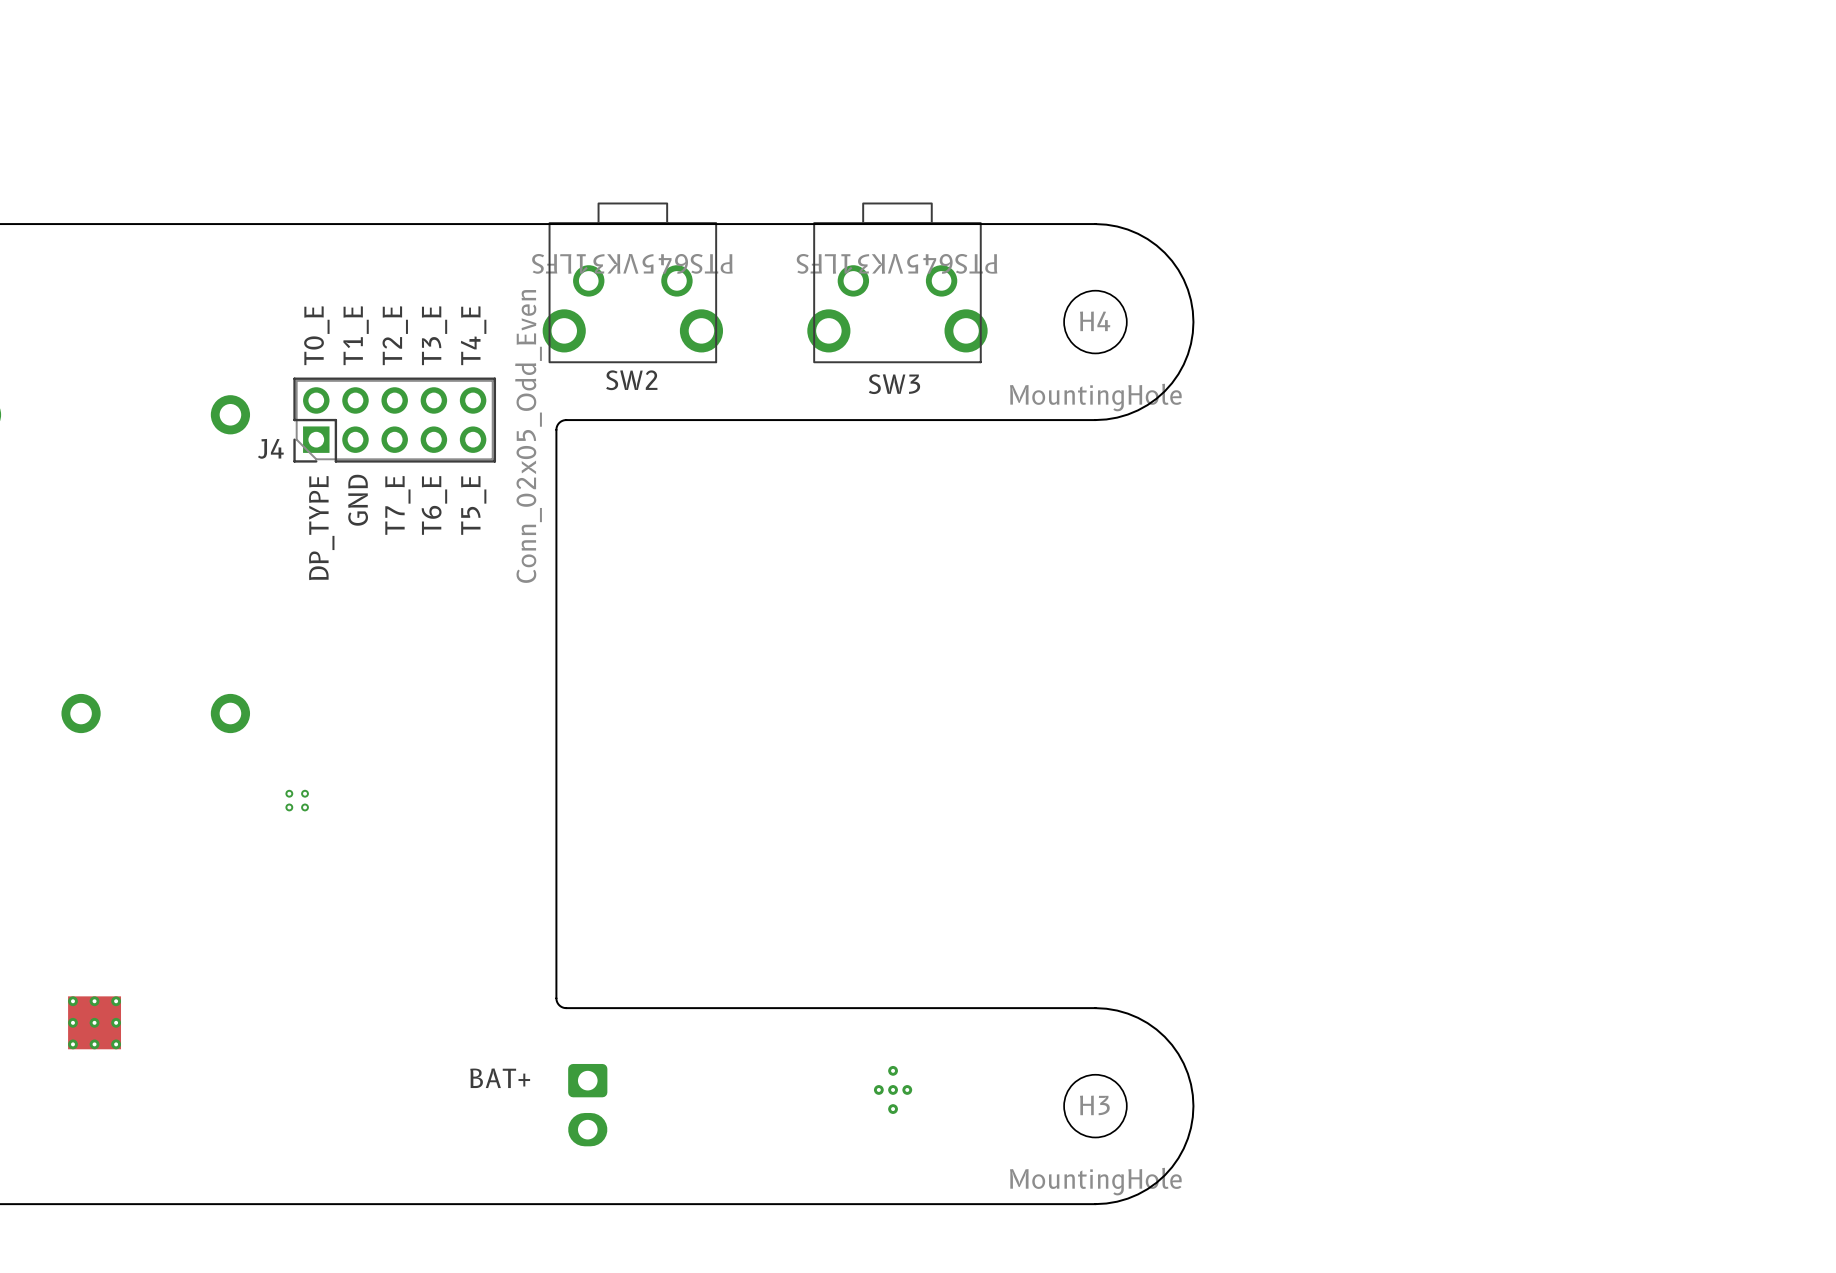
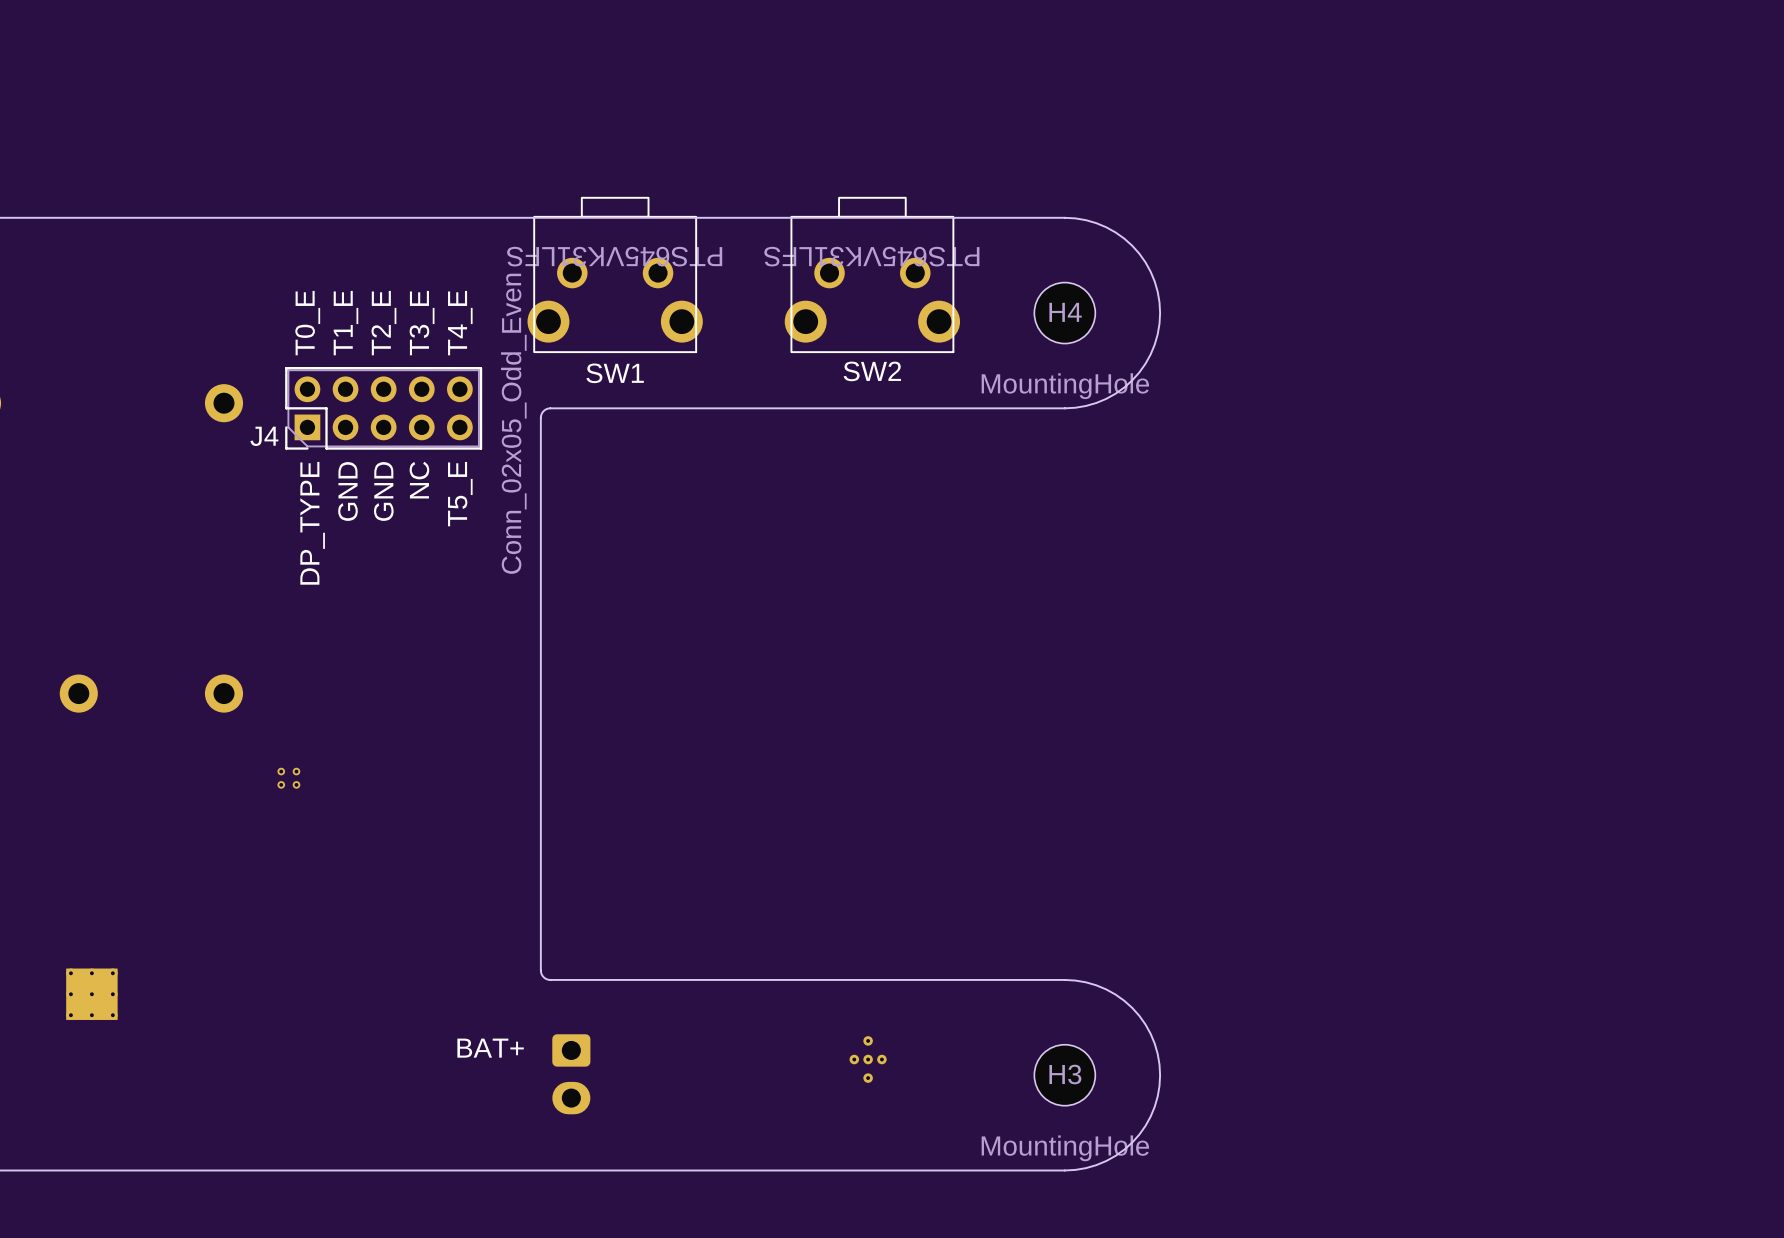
SW2 name: SW2 (631, 380) -> SW1 (615, 373)
SW3 name: SW3 (894, 384) -> SW2 (872, 371)
text: T7_E (397, 505) -> GND (383, 491)
text: T6_E (434, 505) -> NC (419, 480)

